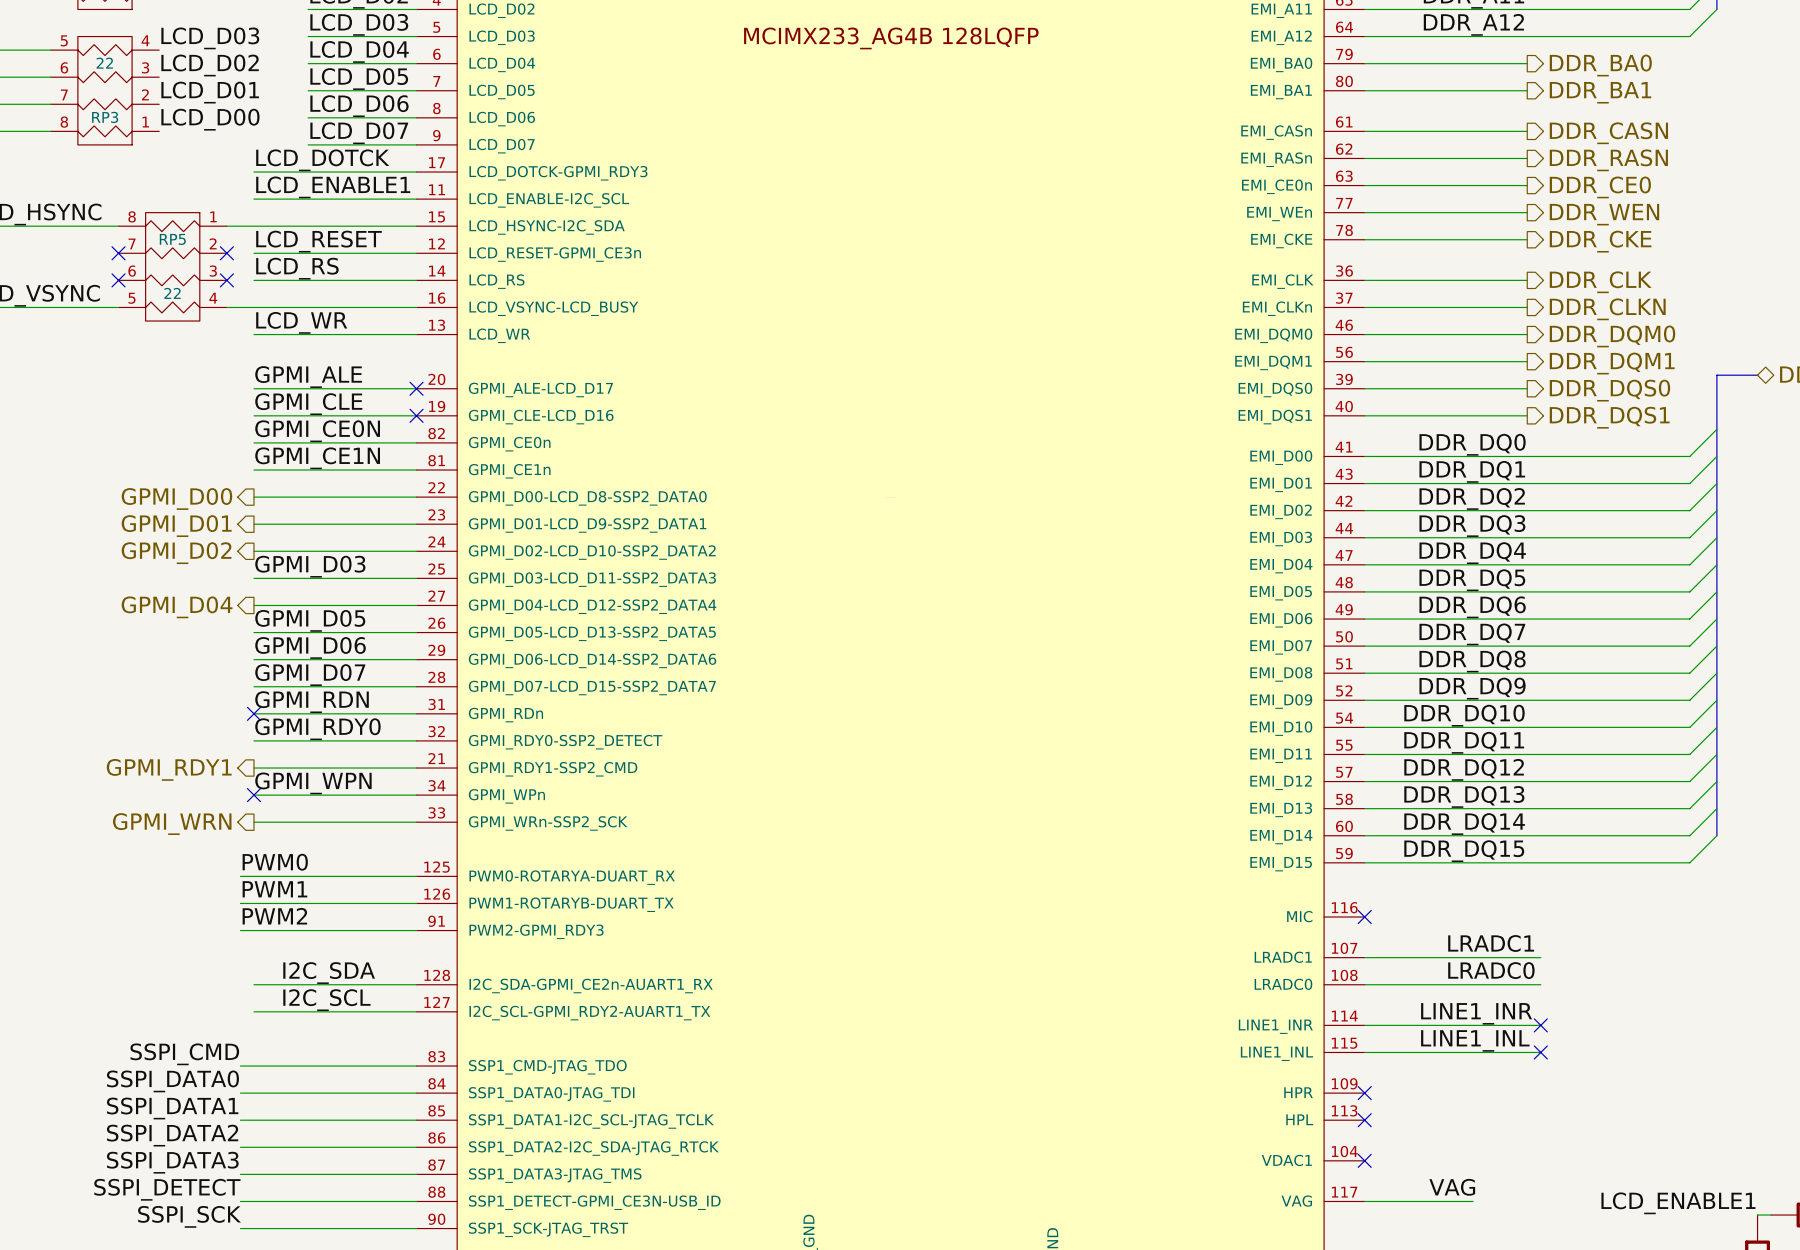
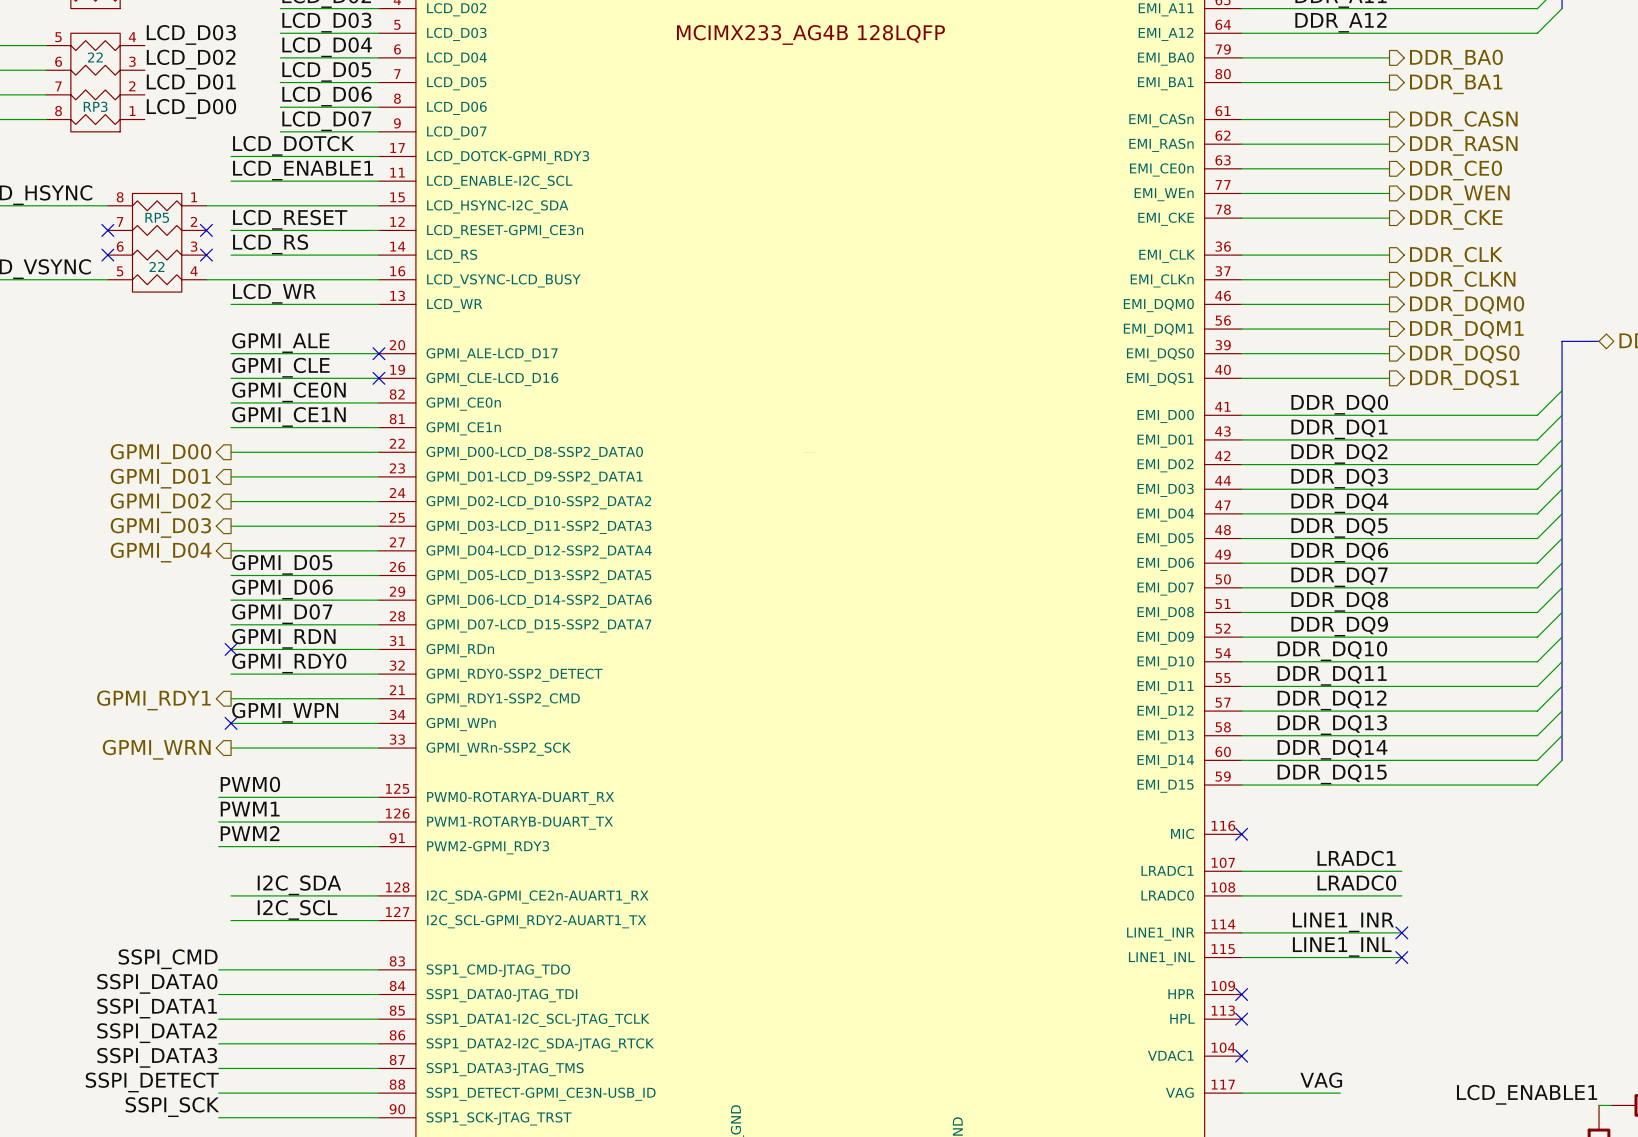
label: GPMI_D03 (310, 566) -> none
hierarchical label: none -> GPMI_D03 (160, 527)

